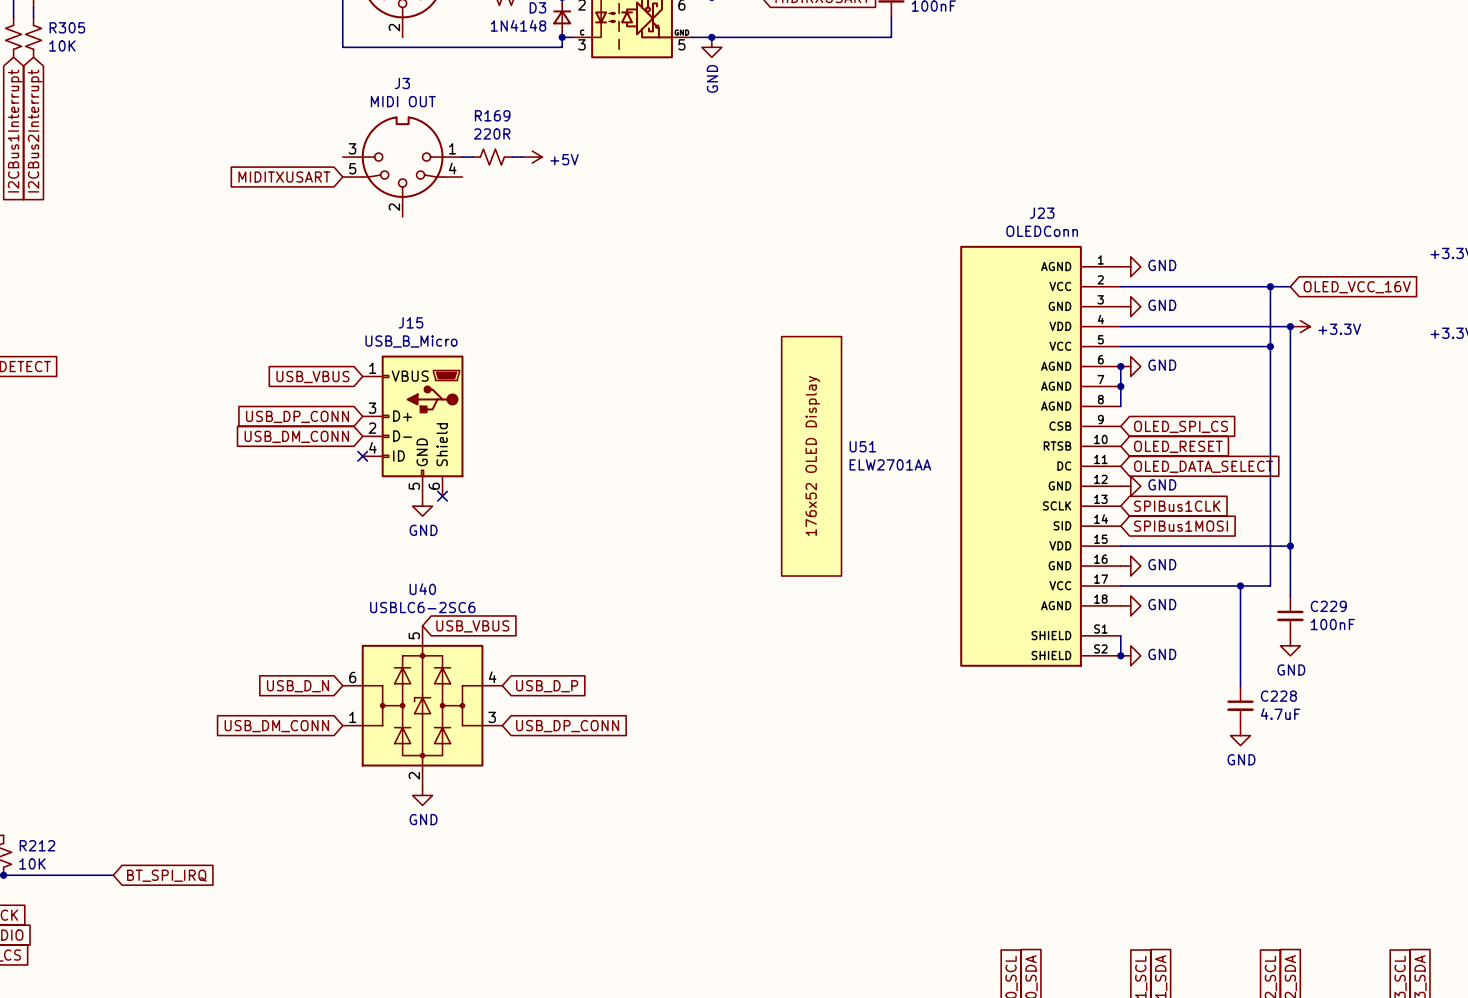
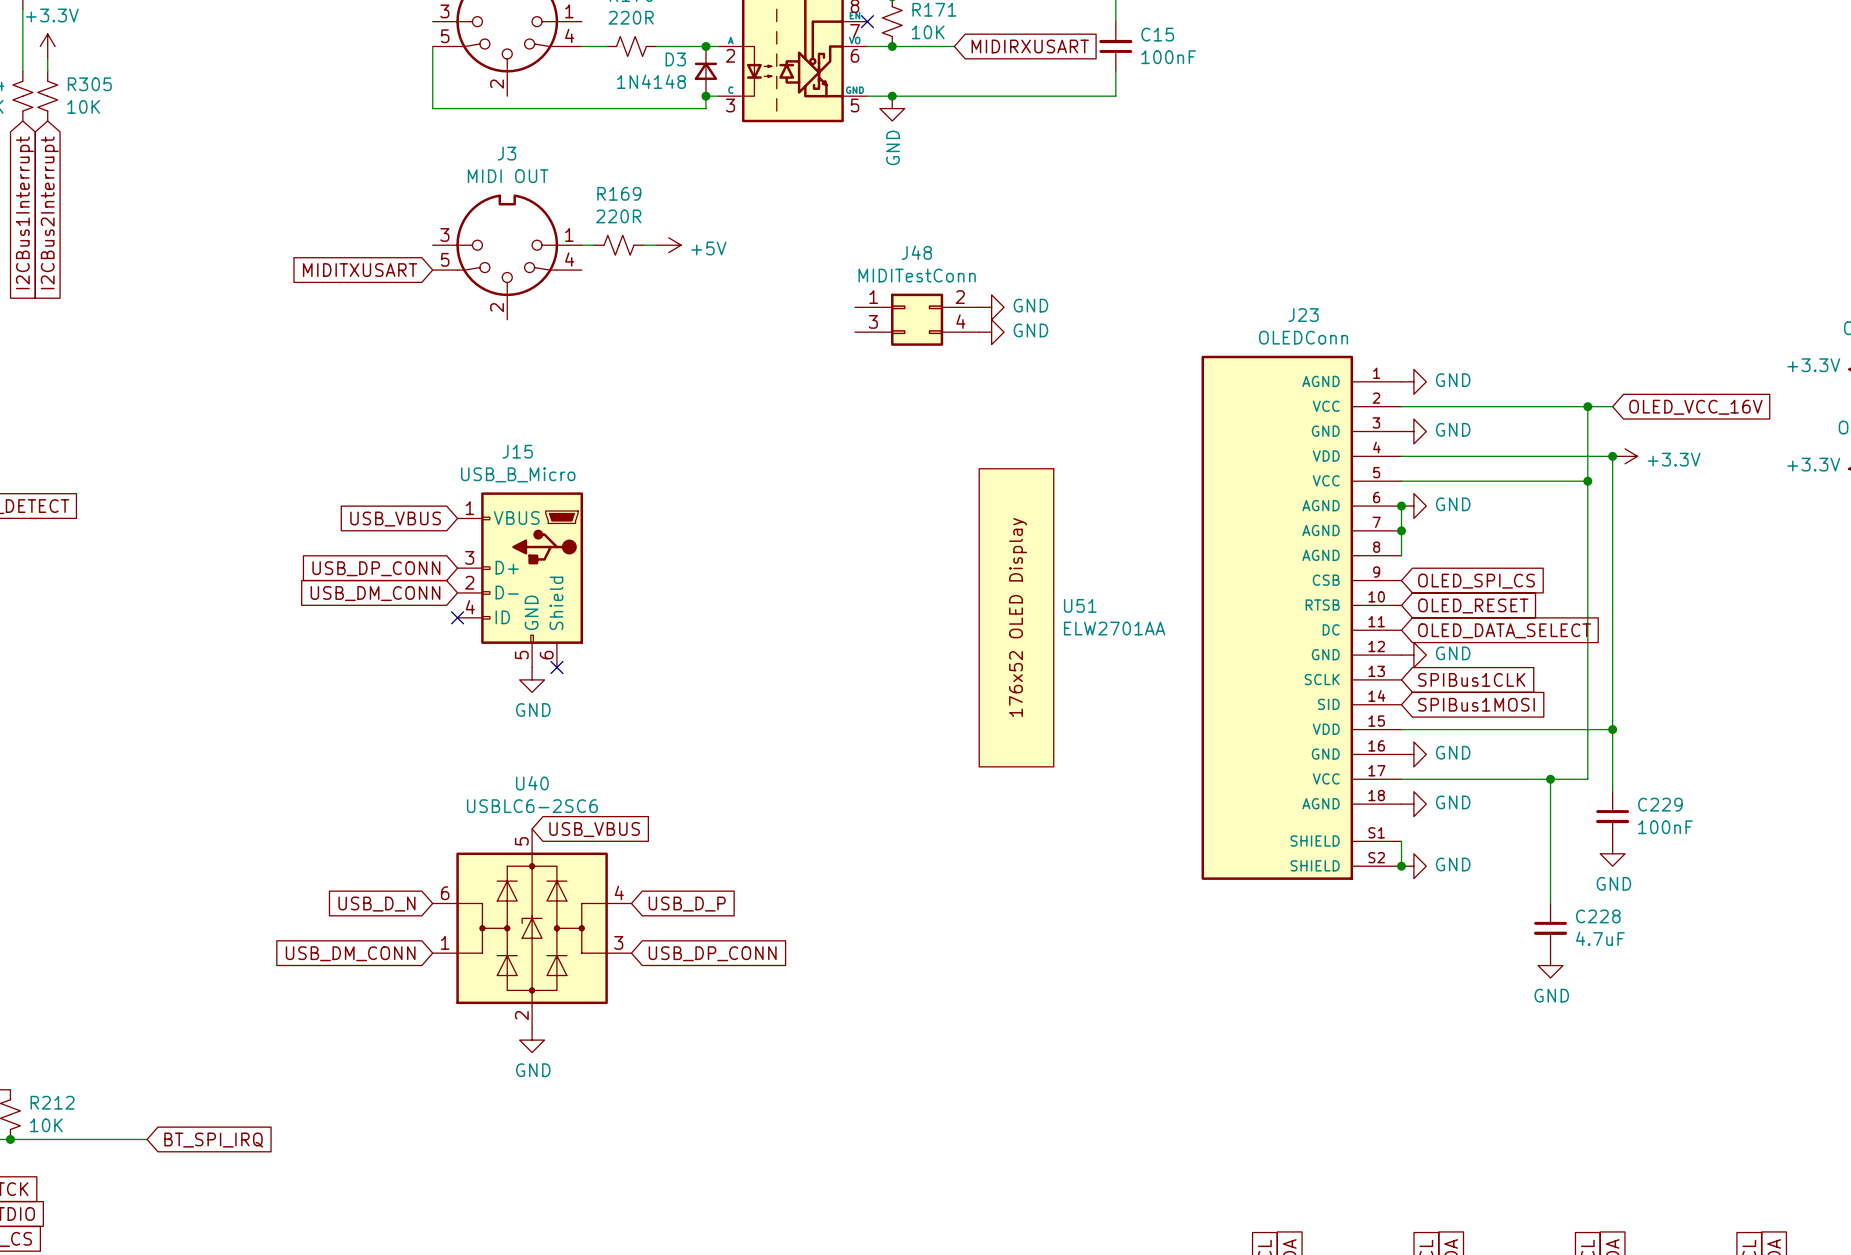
power symbol: none -> GND (991, 307)
J48: none -> MIDITestConn (917, 319)
power symbol: none -> GND (991, 332)

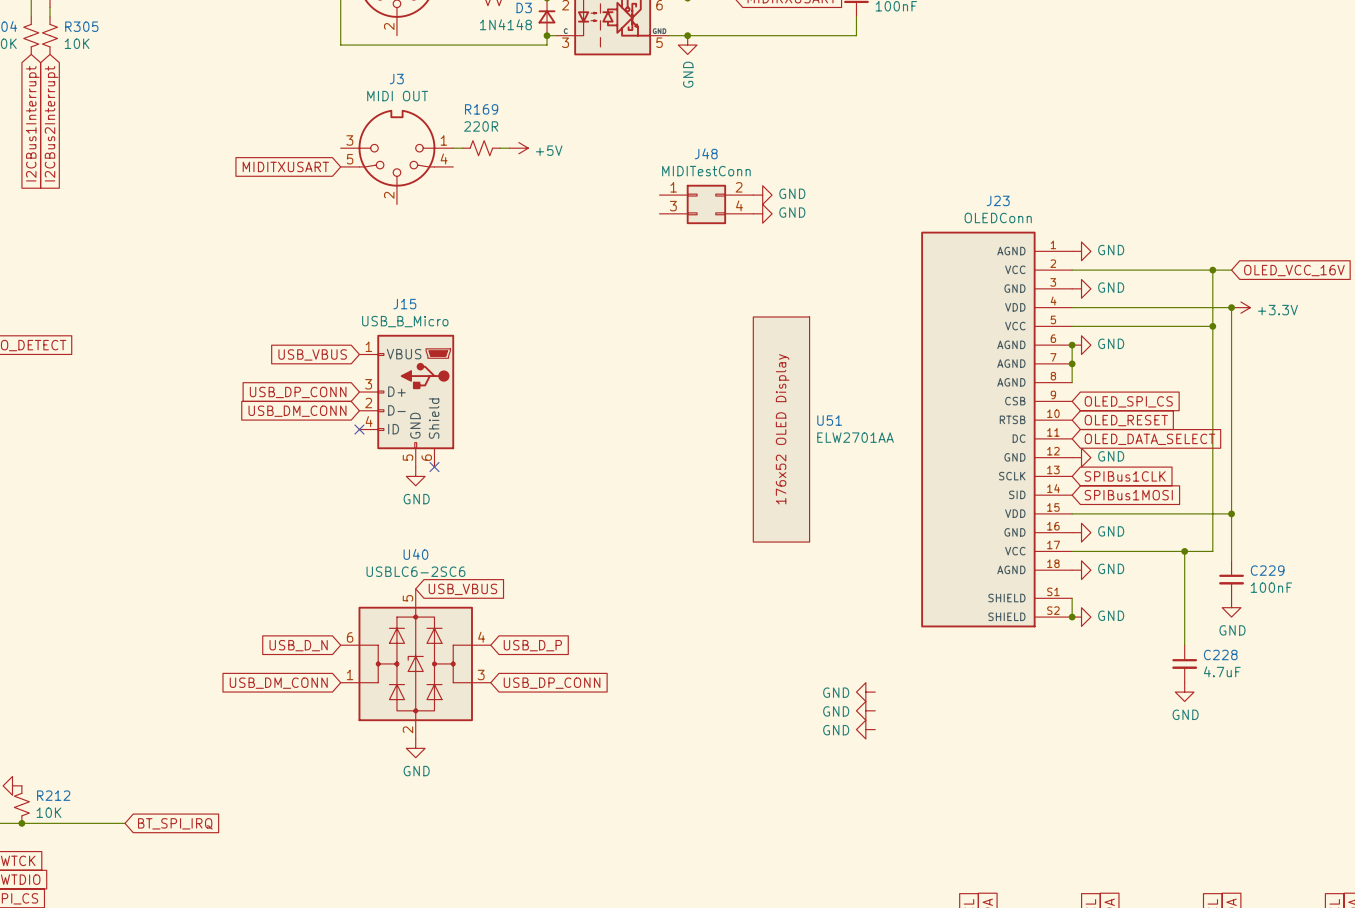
power symbol: none -> GND (865, 692)
power symbol: none -> GND (865, 710)
power symbol: none -> GND (865, 729)

